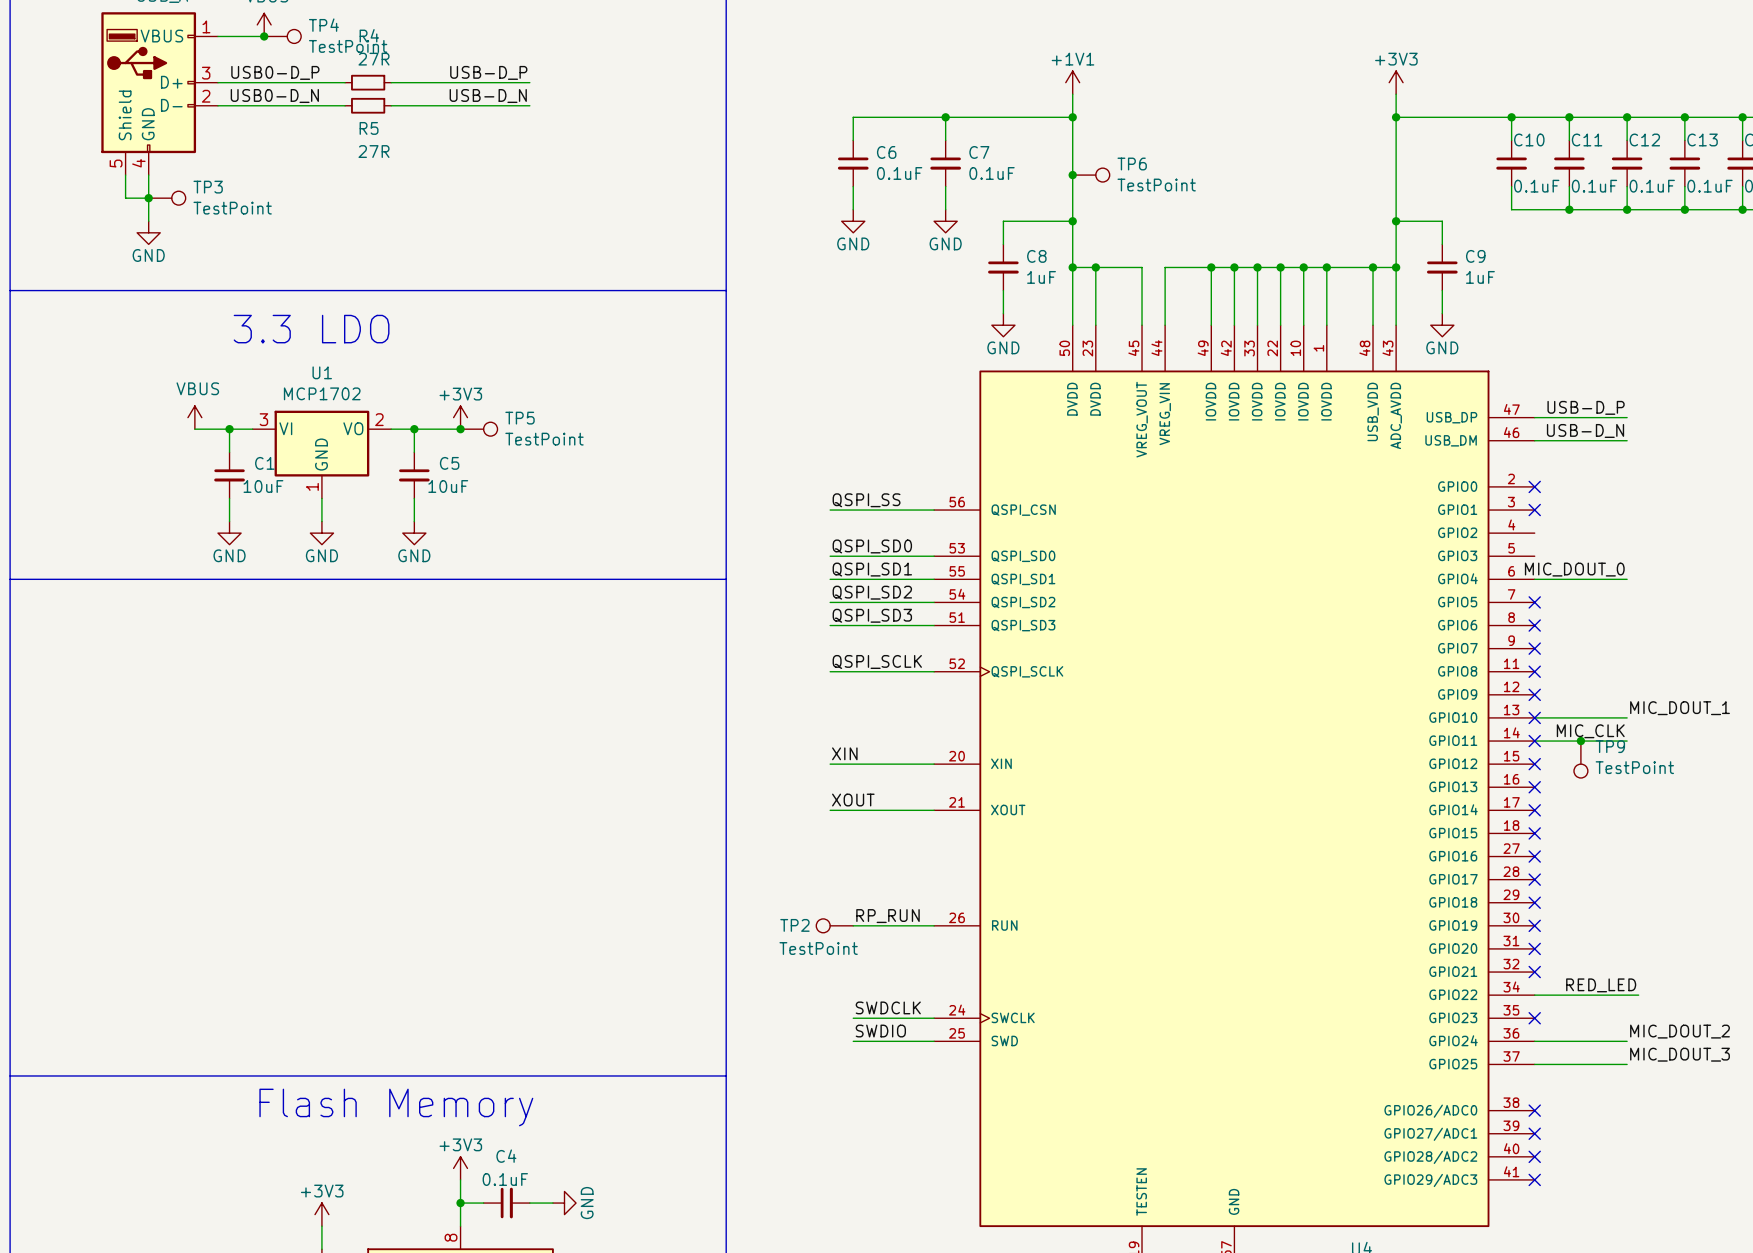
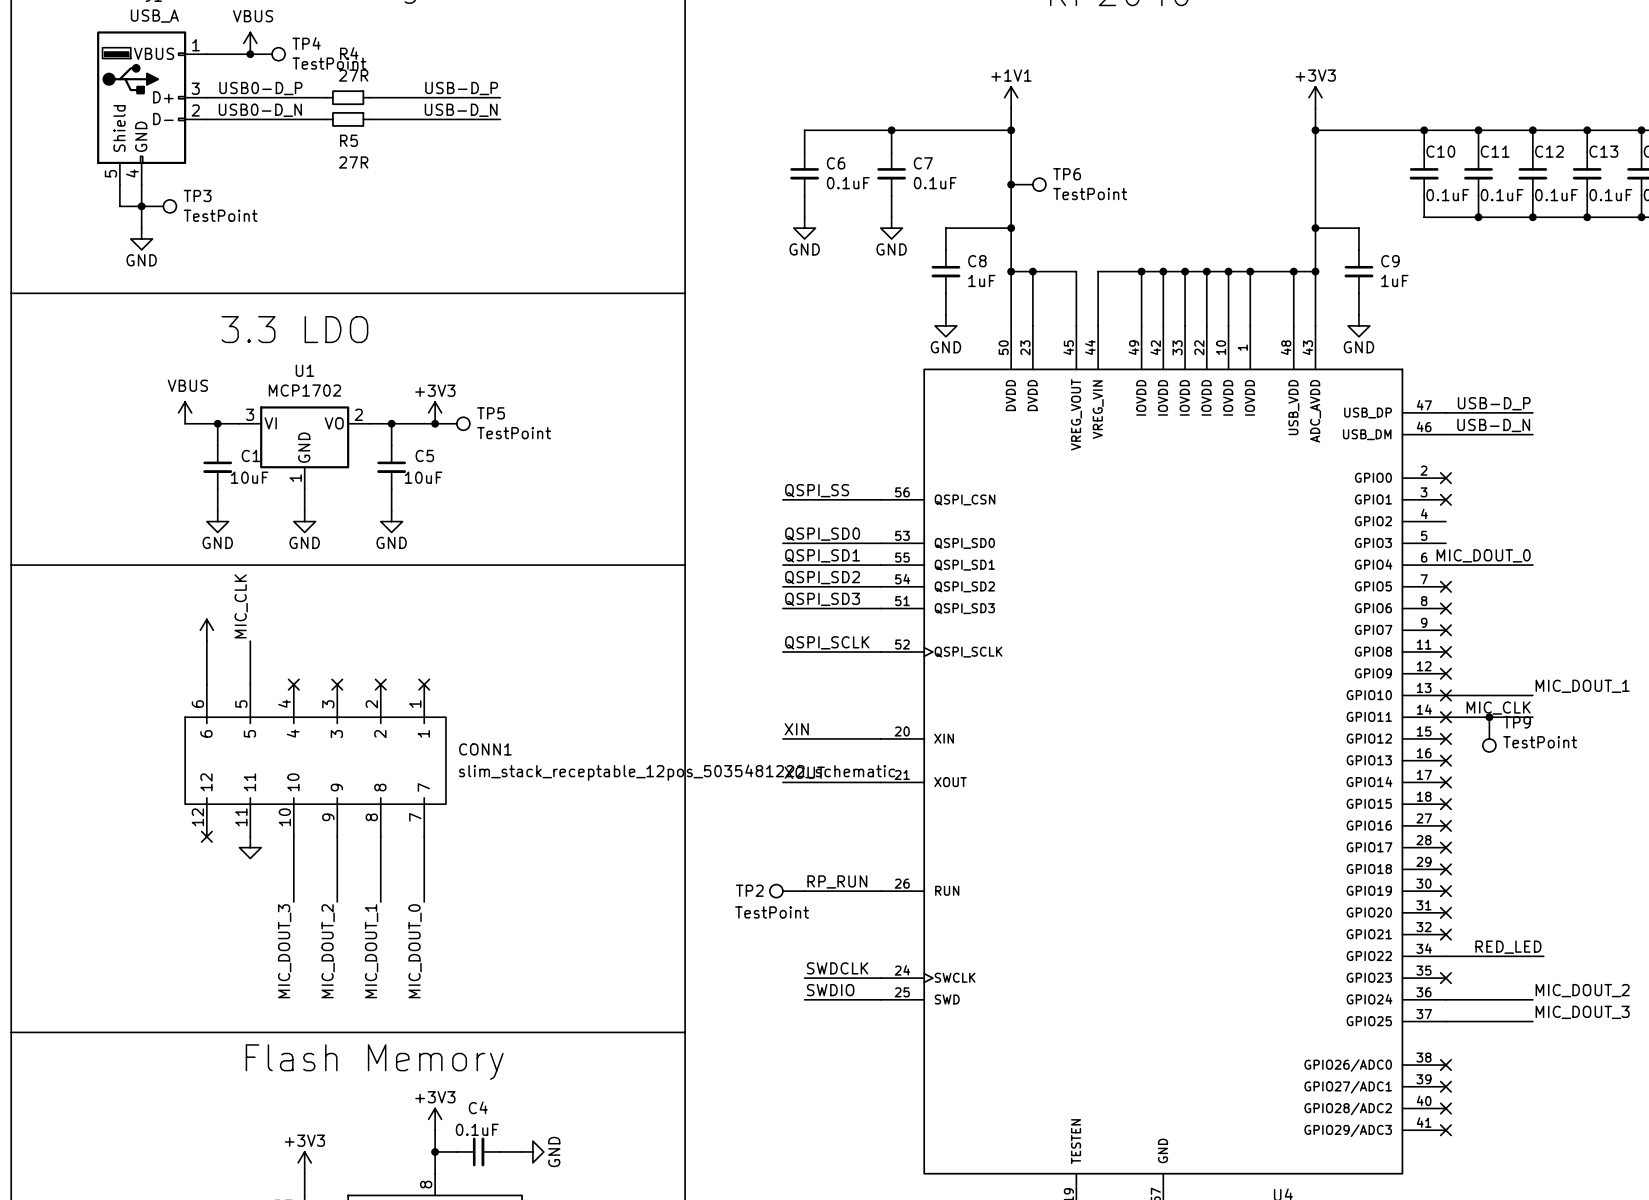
label: none -> MIC_CLK (241, 606)
power symbol: none -> (206, 630)
wire: none -> (206, 641) (206, 684)
wire: none -> (250, 641) (250, 684)
no-connect mark: none -> (293, 684)
no-connect mark: none -> (337, 684)
no-connect mark: none -> (380, 684)
no-connect mark: none -> (424, 684)
CONN1: none -> slim_stack_receptable_12pos_5035481222_schematic (315, 760)
no-connect mark: none -> (206, 836)
wire: none -> (293, 836) (293, 901)
wire: none -> (337, 836) (337, 901)
wire: none -> (380, 836) (380, 901)
wire: none -> (424, 836) (424, 901)
power symbol: none -> (250, 847)
label: none -> MIC_DOUT_3 (284, 951)
label: none -> MIC_DOUT_2 (328, 951)
label: none -> MIC_DOUT_1 (371, 951)
label: none -> MIC_DOUT_0 (415, 951)

